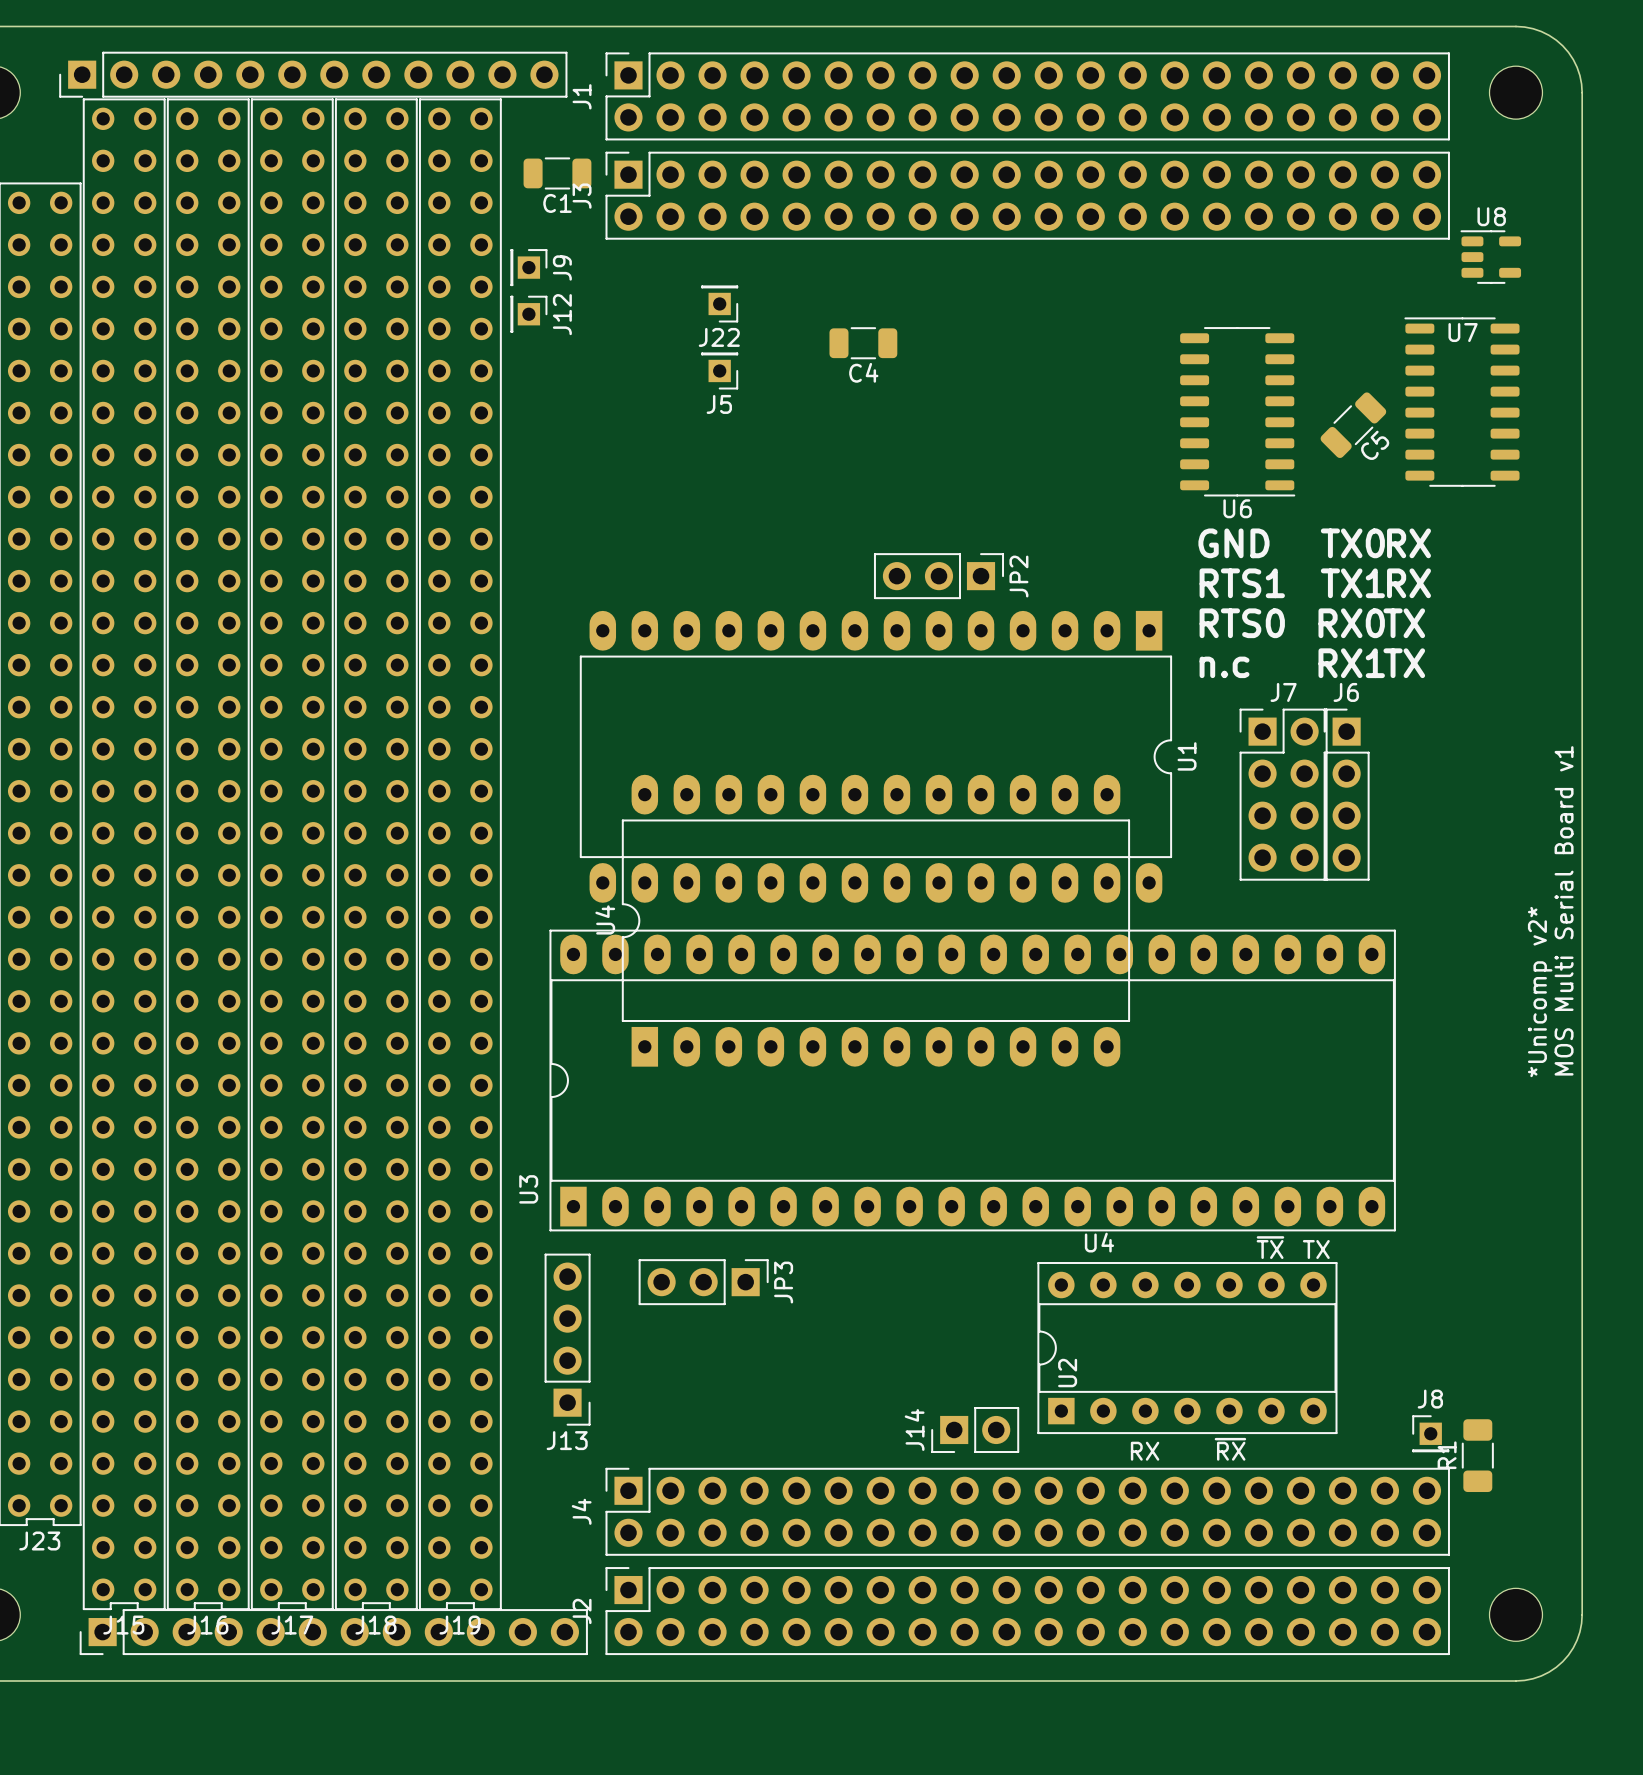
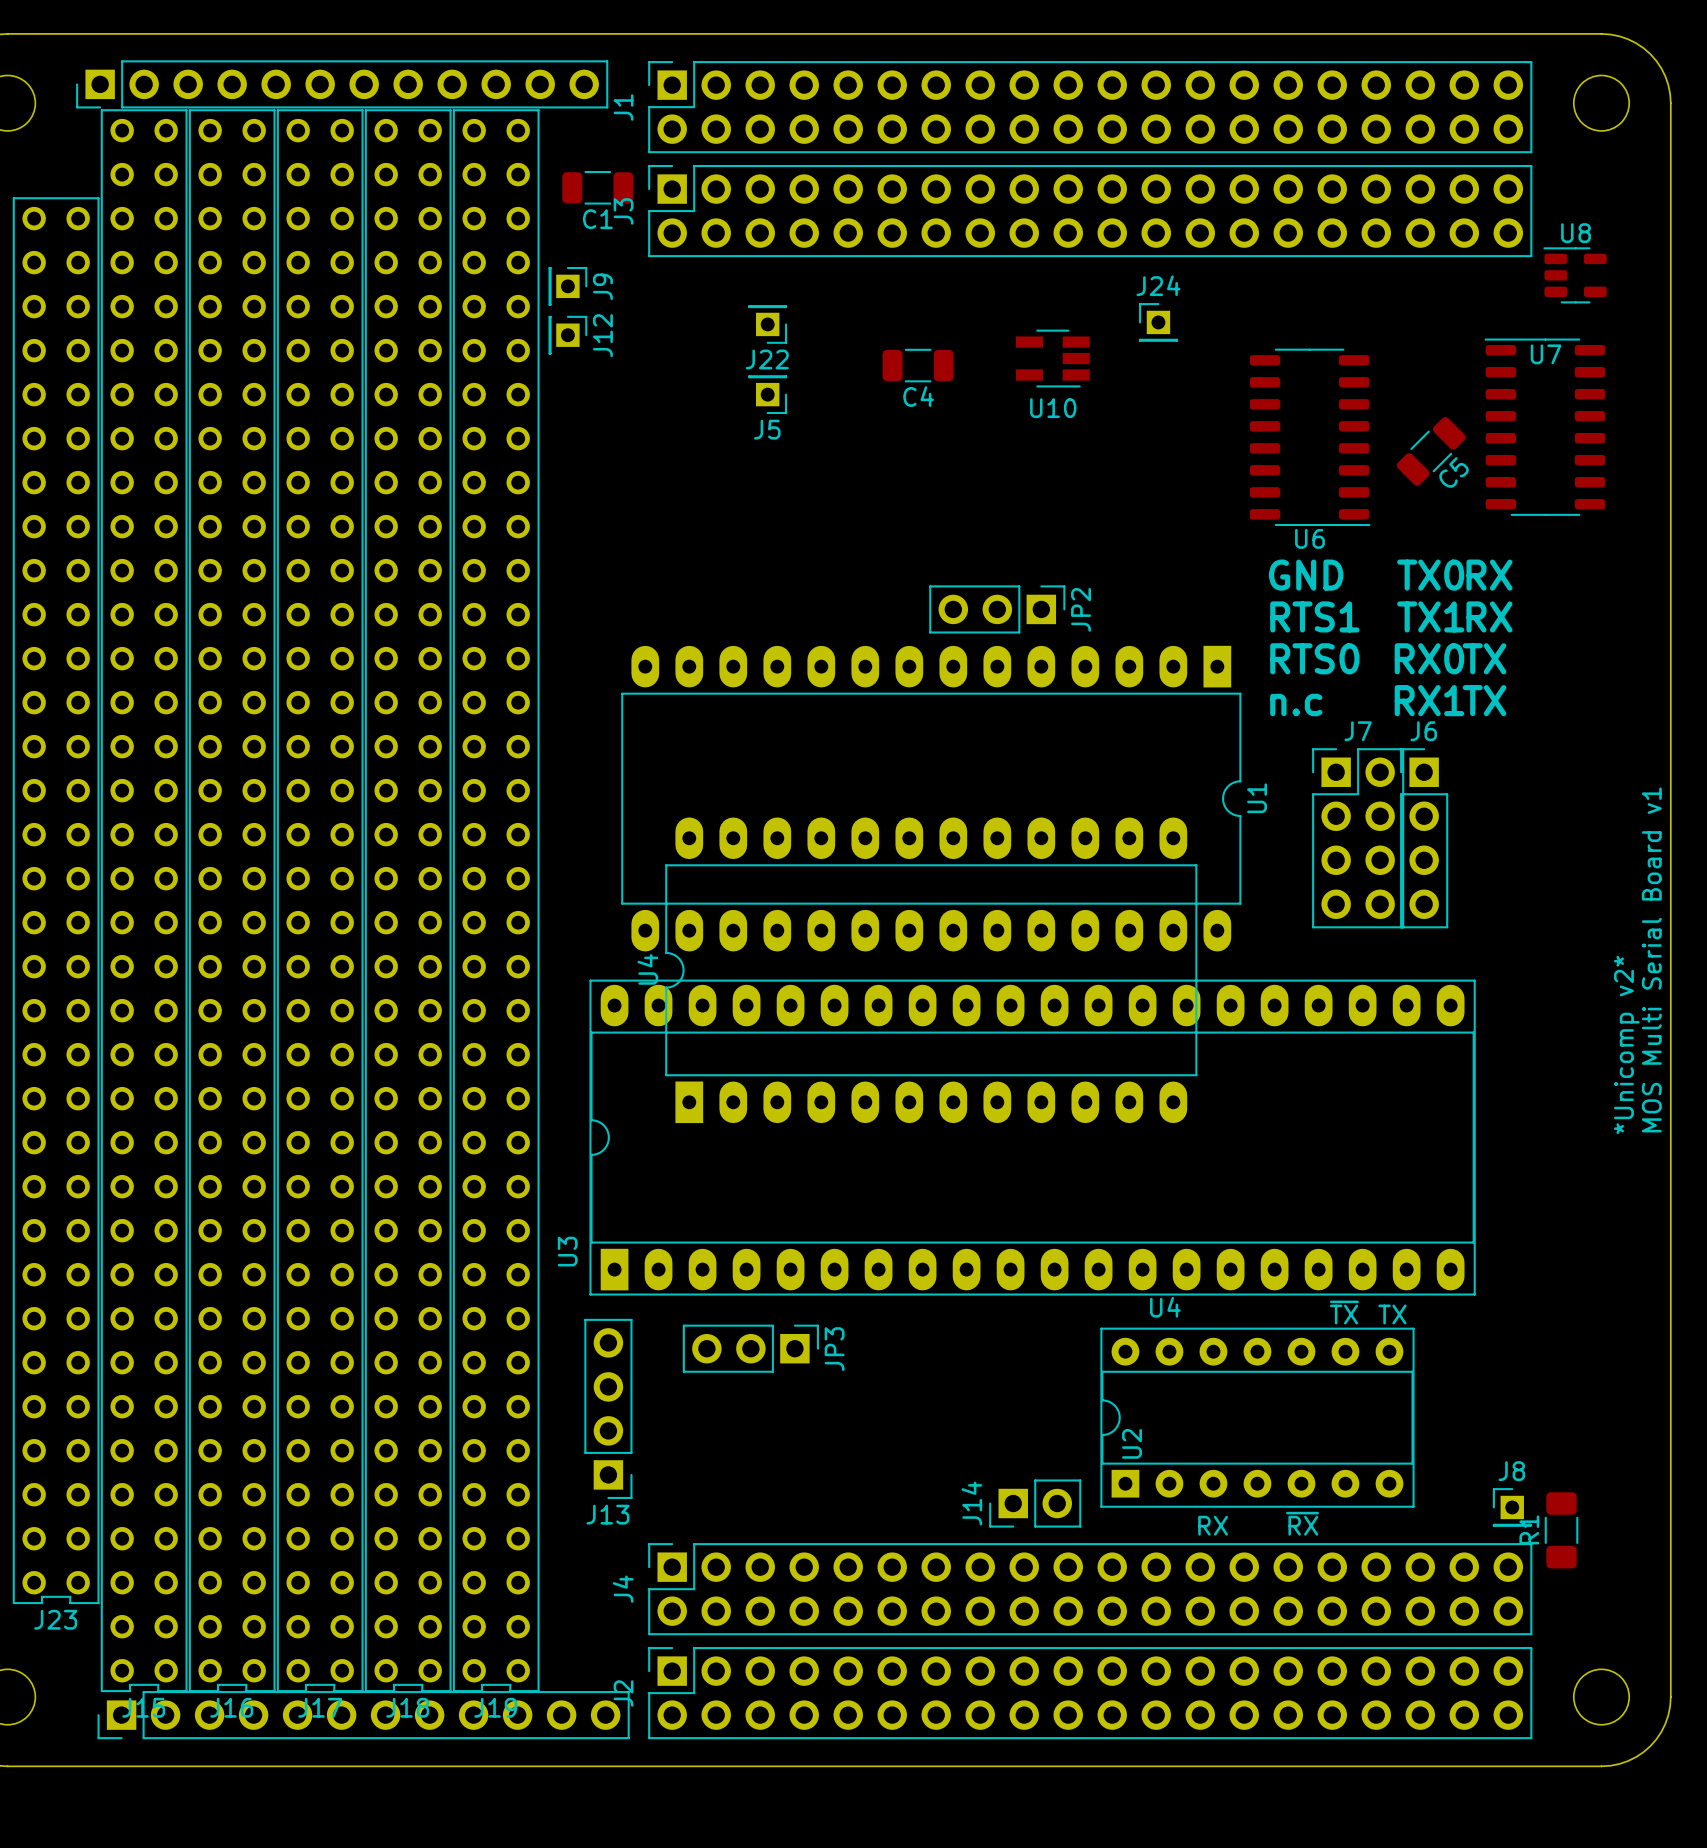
J24: none -> (1158, 322)
U10: none -> (1052, 358)

